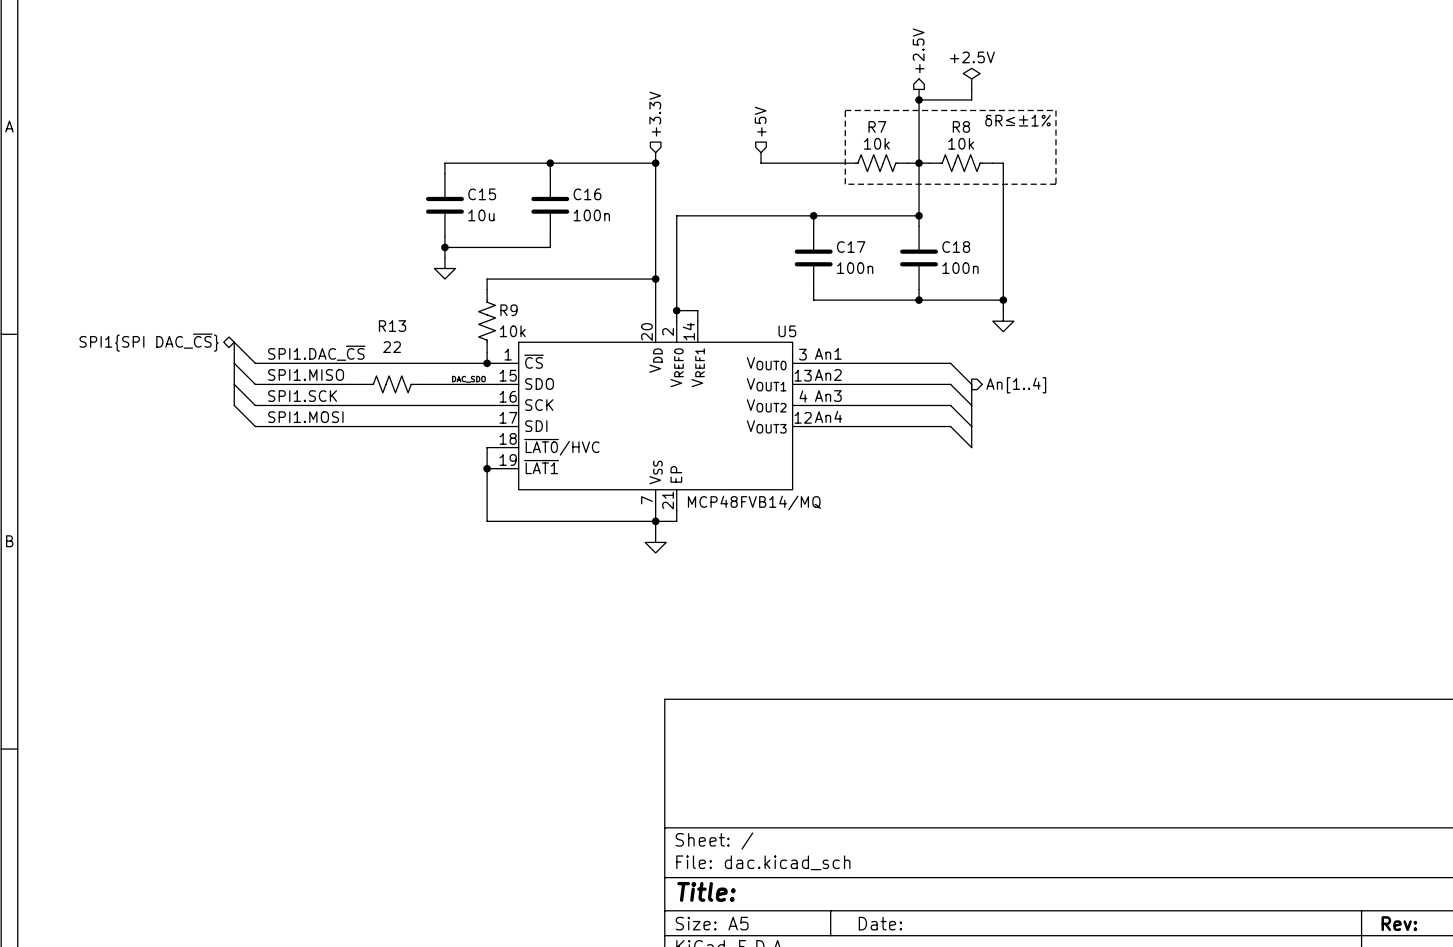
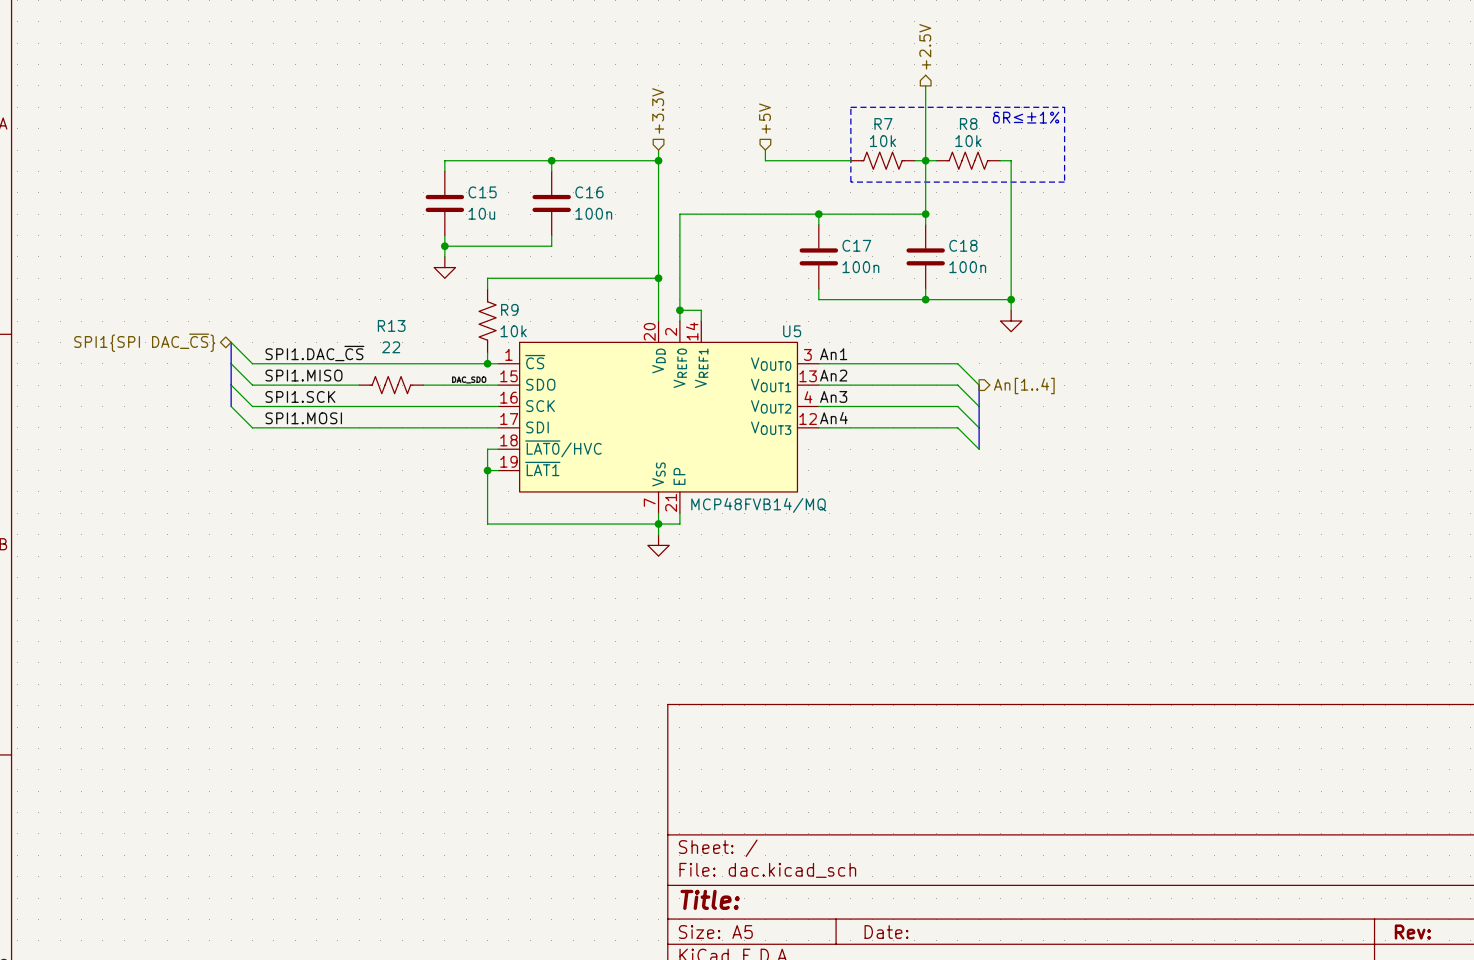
power symbol: +2.5V (971, 78) -> none
wire: (971, 89) (971, 99) (919, 99) -> none
junction: (919, 99) -> none

